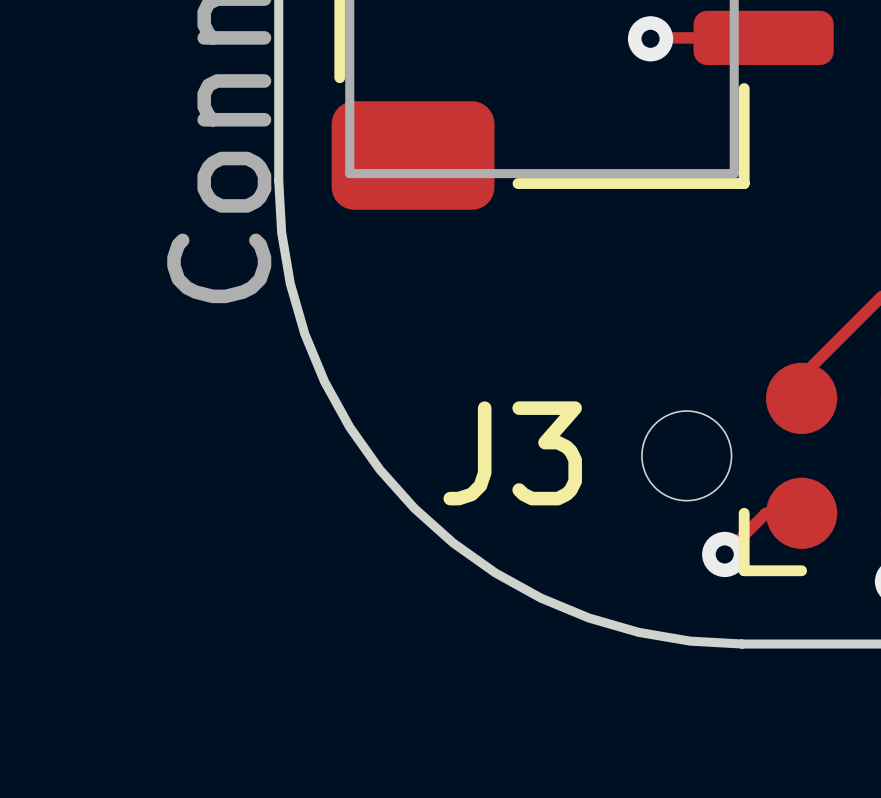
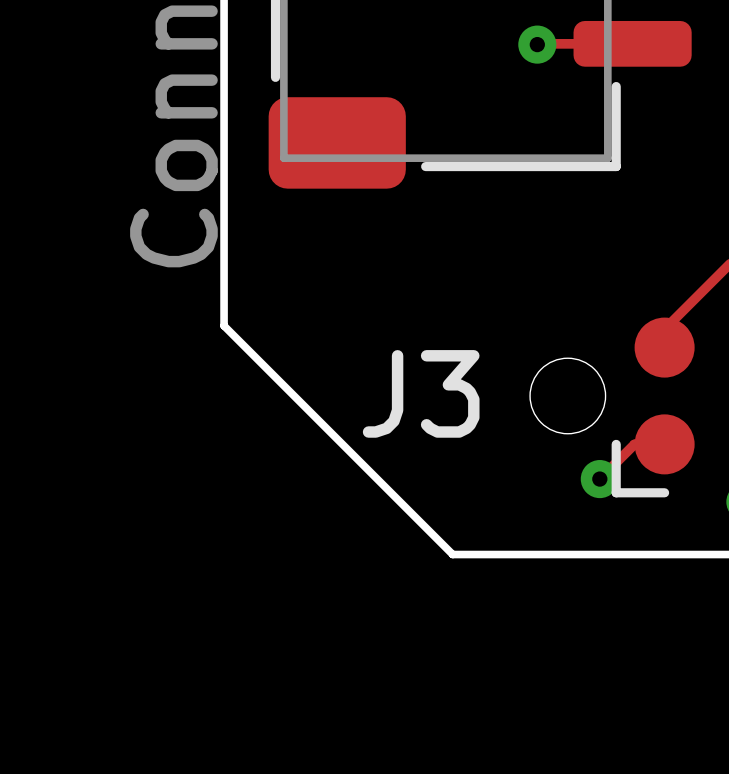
board edge: (278, 180) (281, 232) (290, 283) (304, 333) (324, 381) (349, 427) (379, 469) (414, 508) (453, 542) (495, 573) (541, 598) (589, 618) (638, 632) (690, 641) (742, 644) -> (224, 164) (224, 325) (452, 554) (614, 554)

